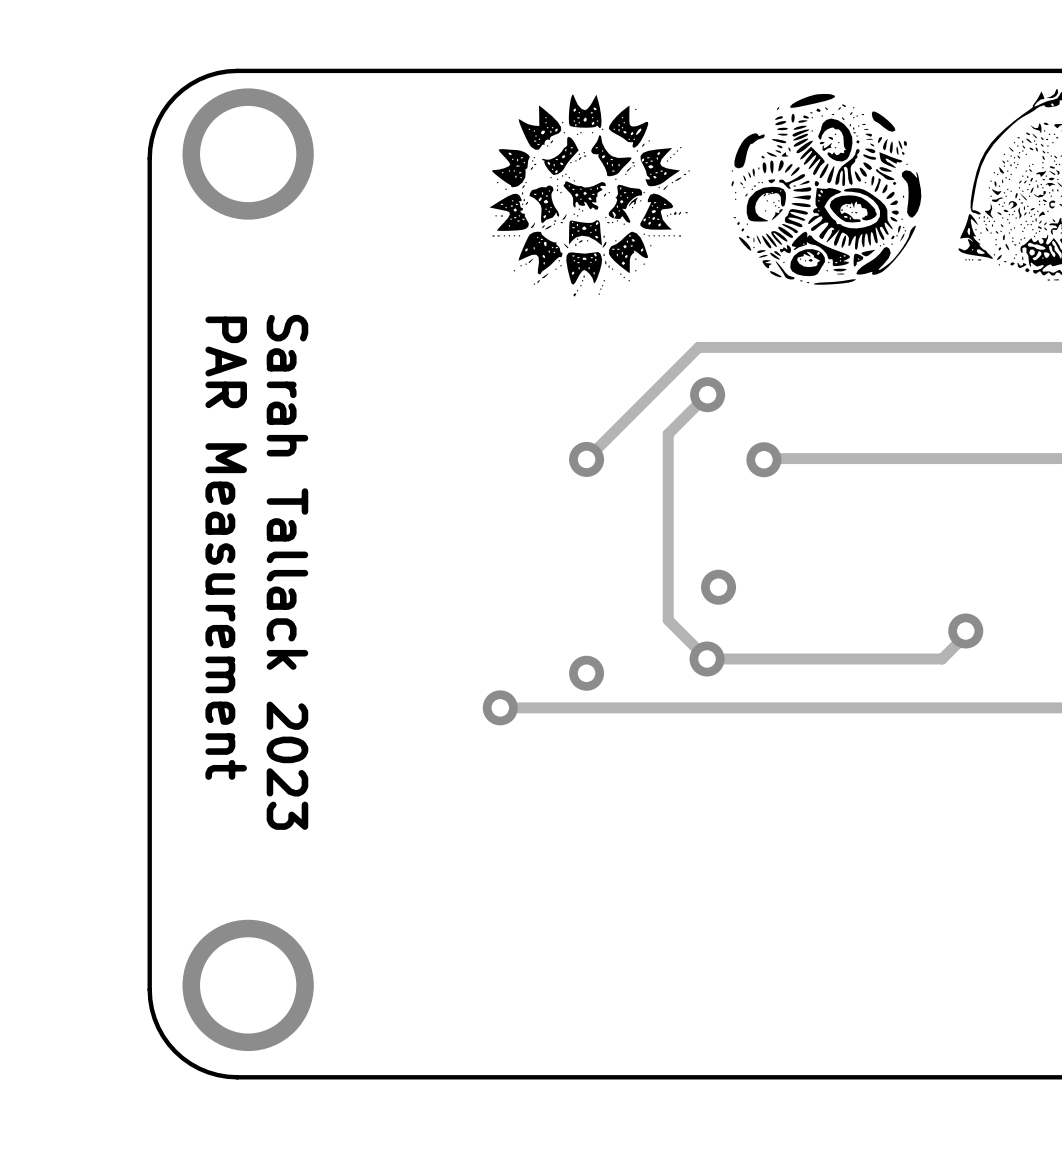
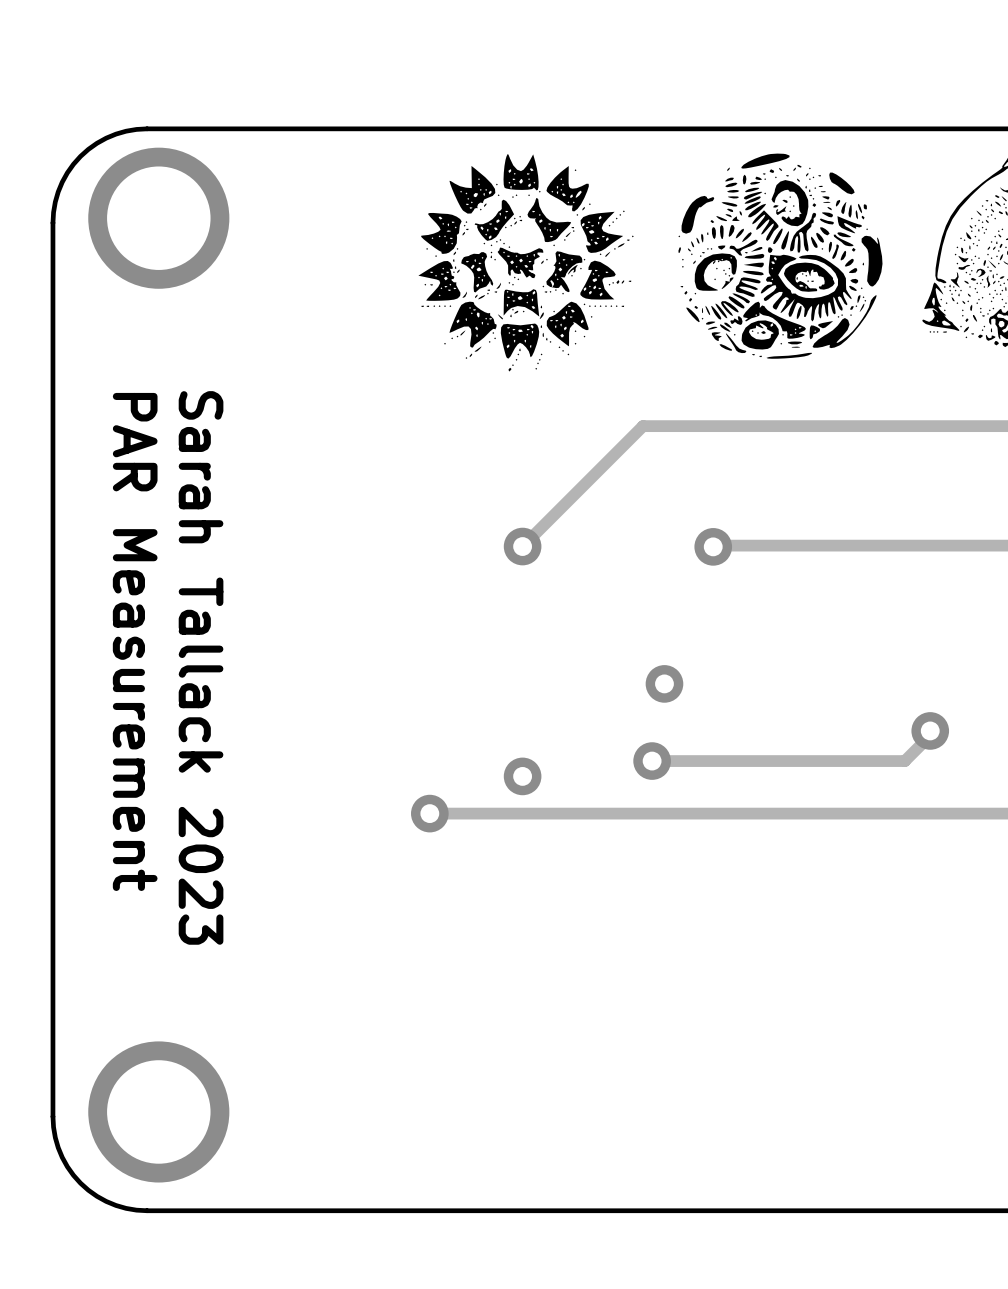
track: (707, 394) (668, 434) (668, 620) (707, 658) -> none
via: (707, 394) -> none

